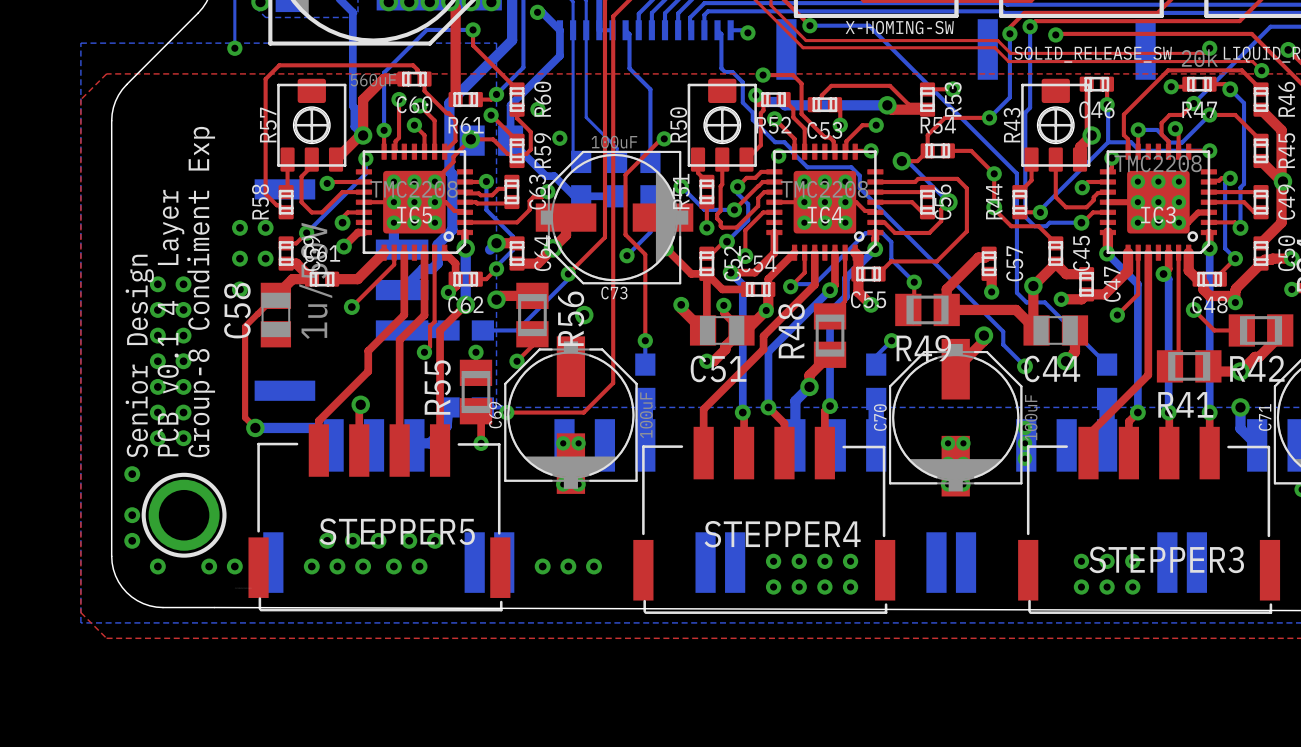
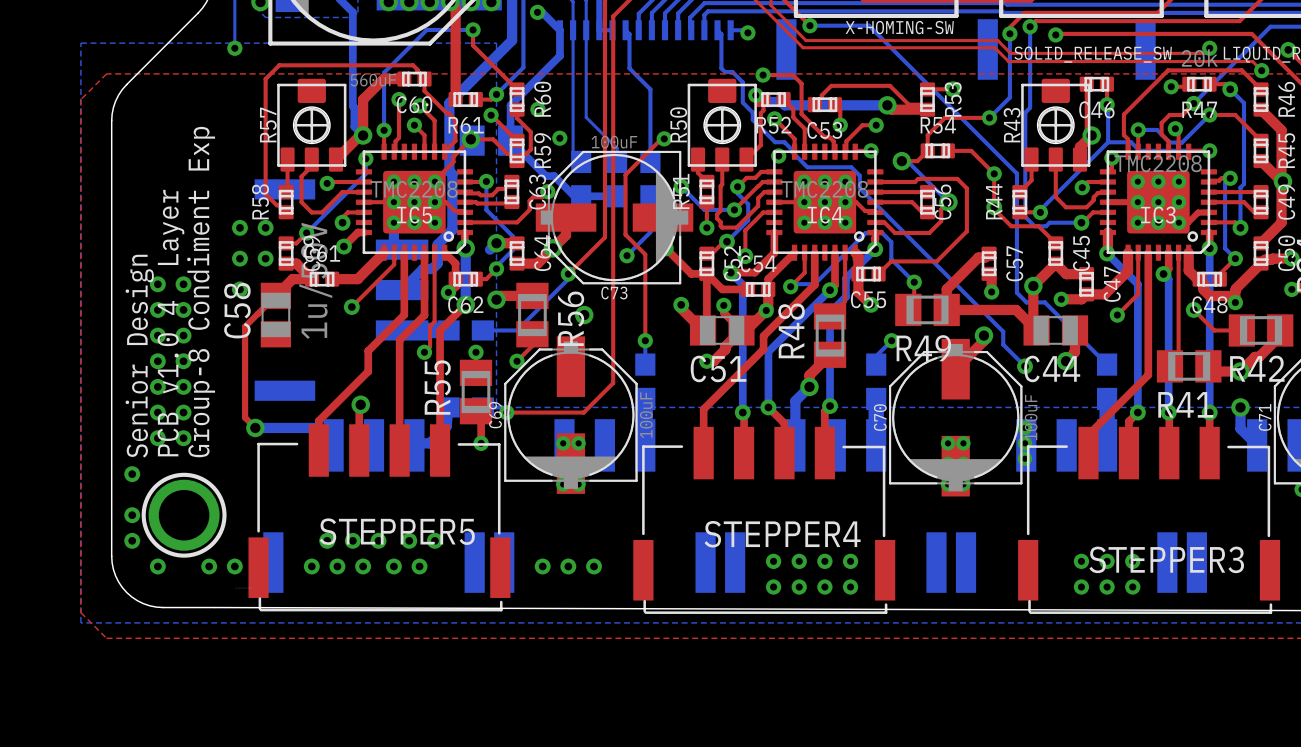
text: PCB v0.1 4 Layer (170, 323) -> PCB v1.0 4 Layer (170, 323)

